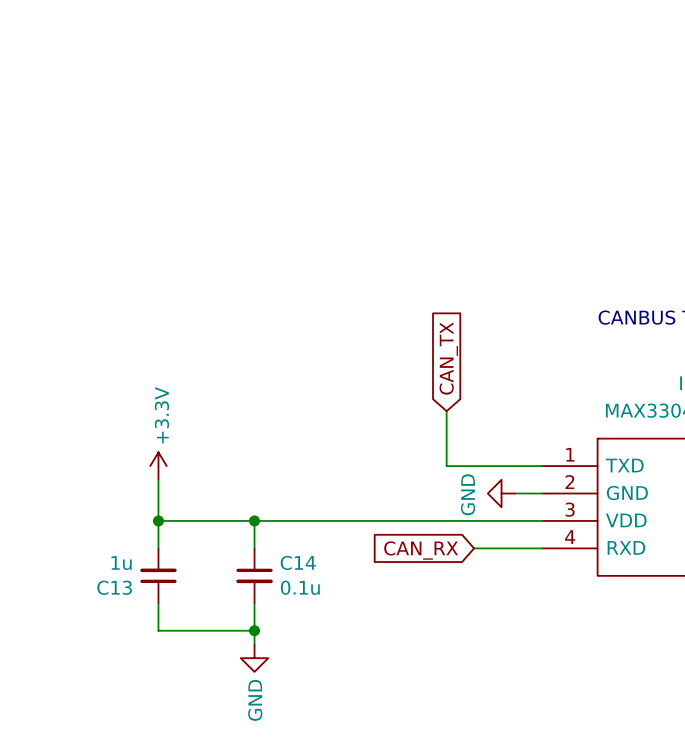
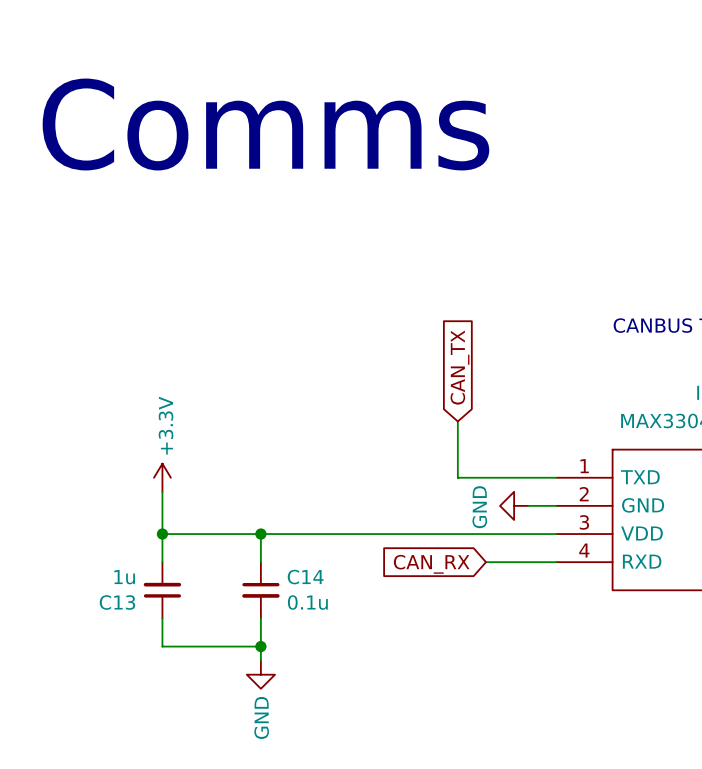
text: none -> Comms (265, 124)

